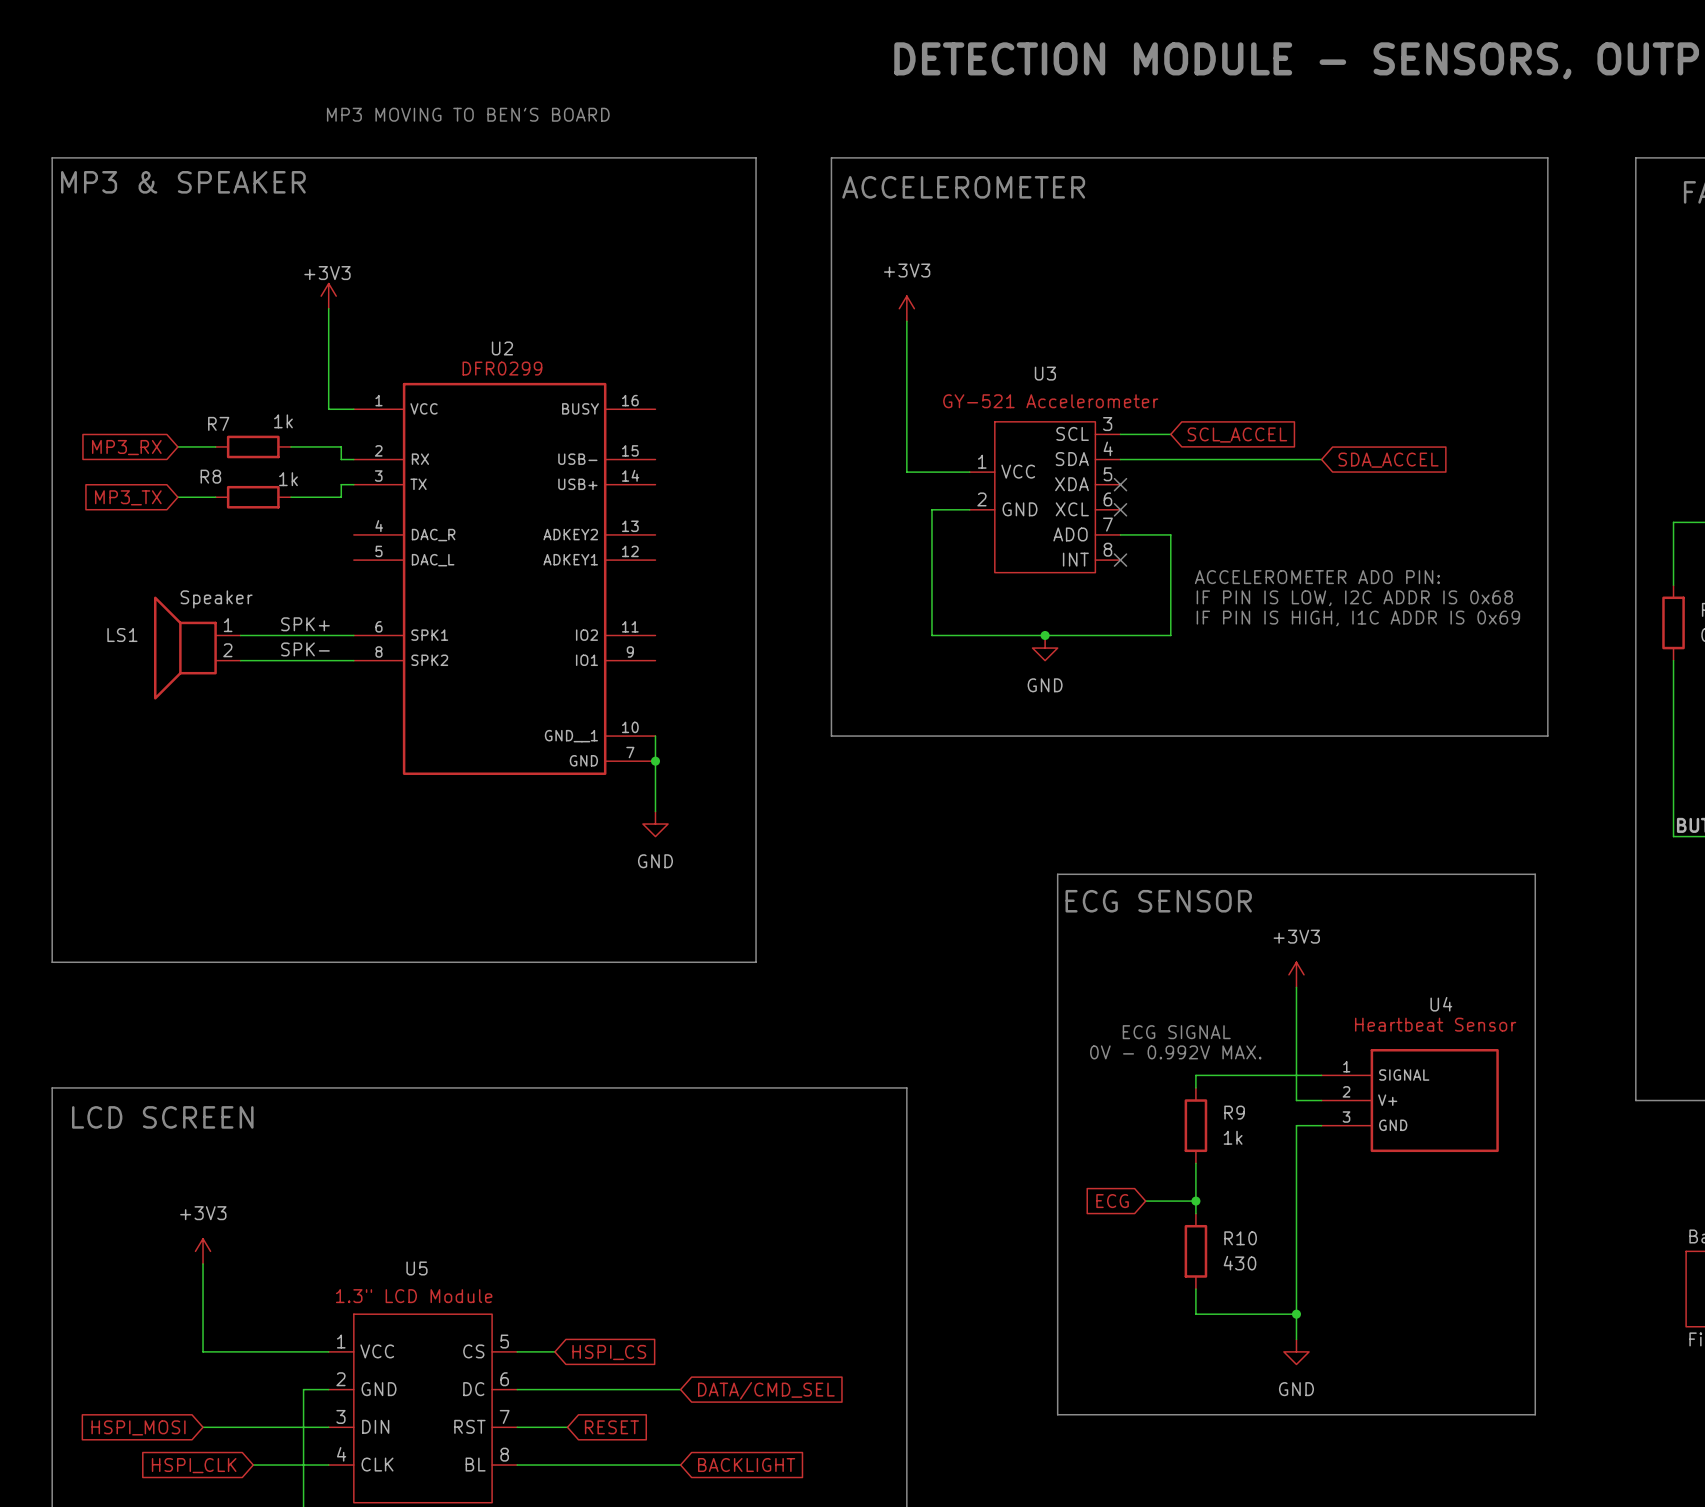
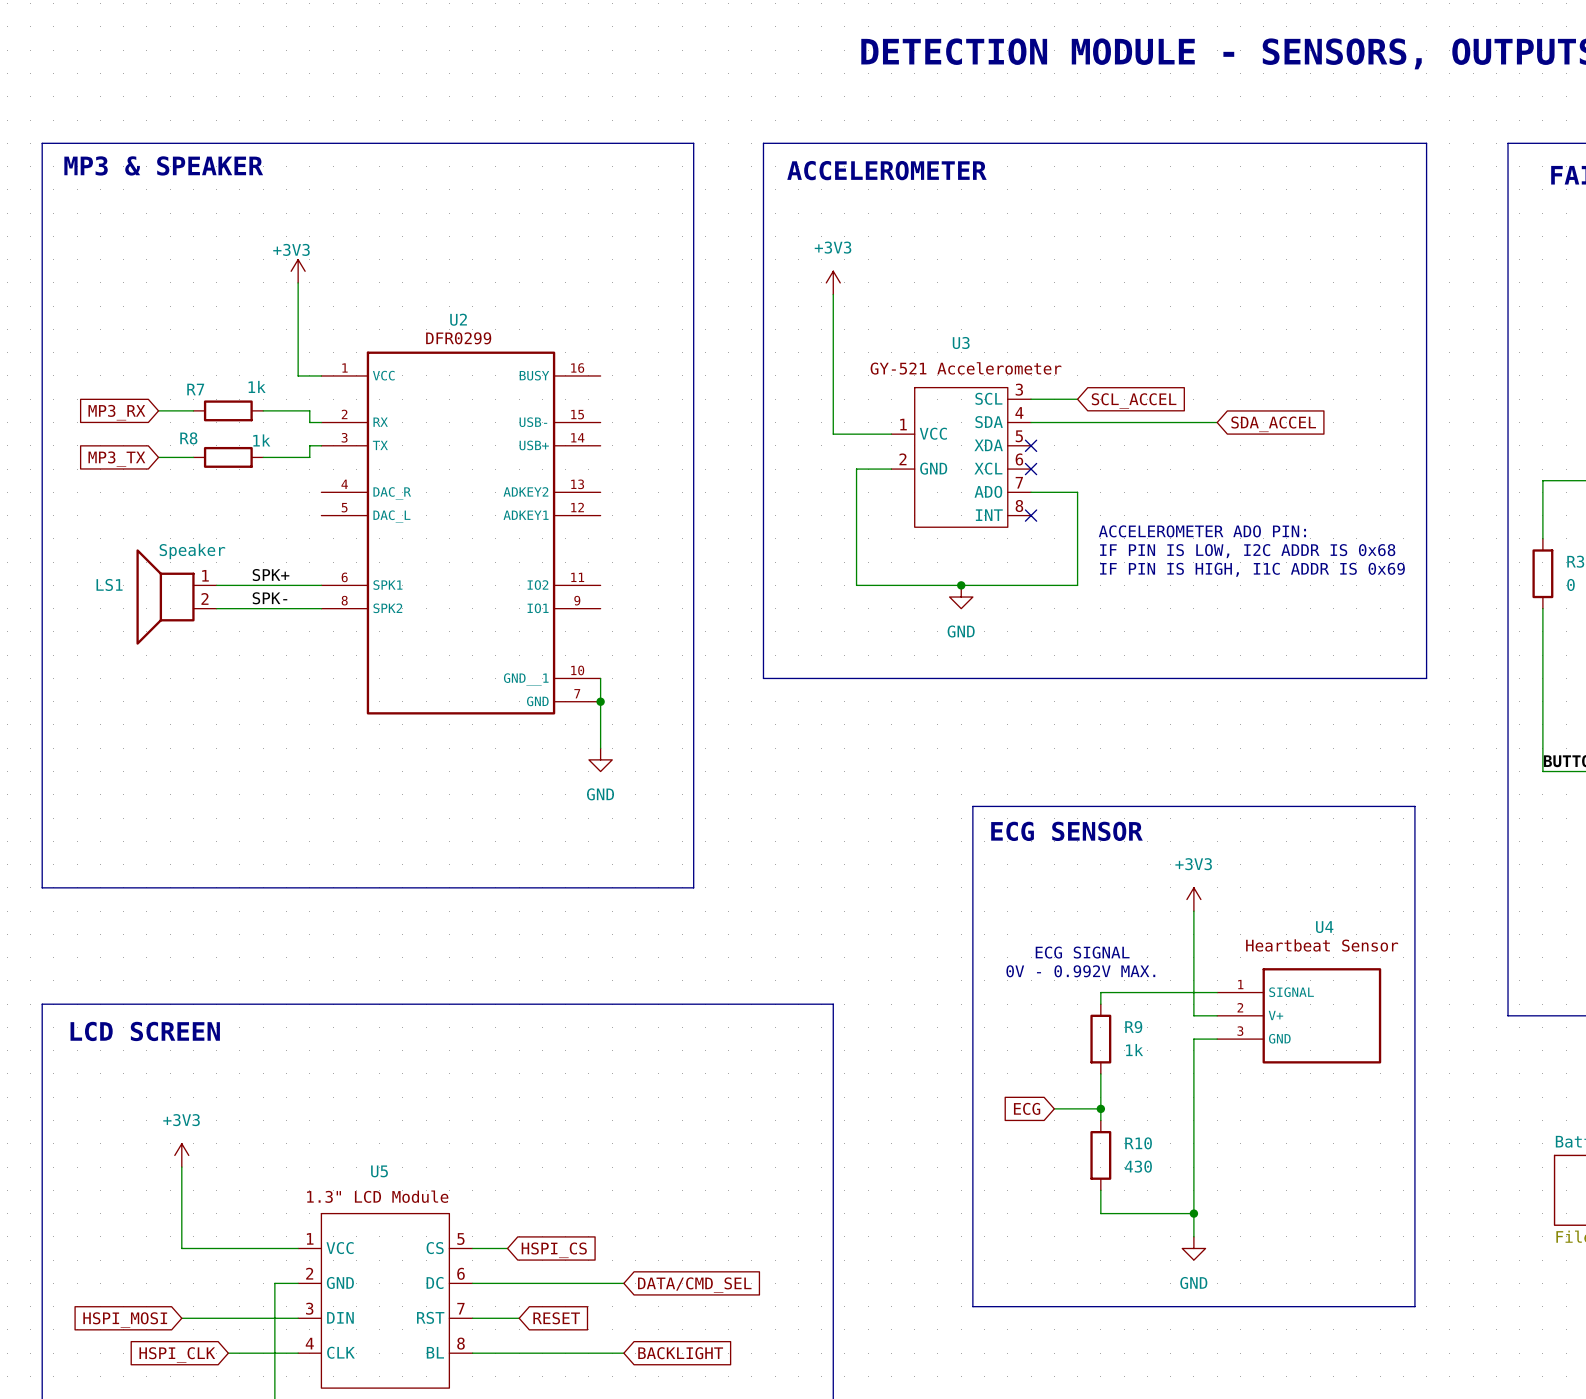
text: MP3 MOVING TO BEN'S BOARD (468, 114) -> none

